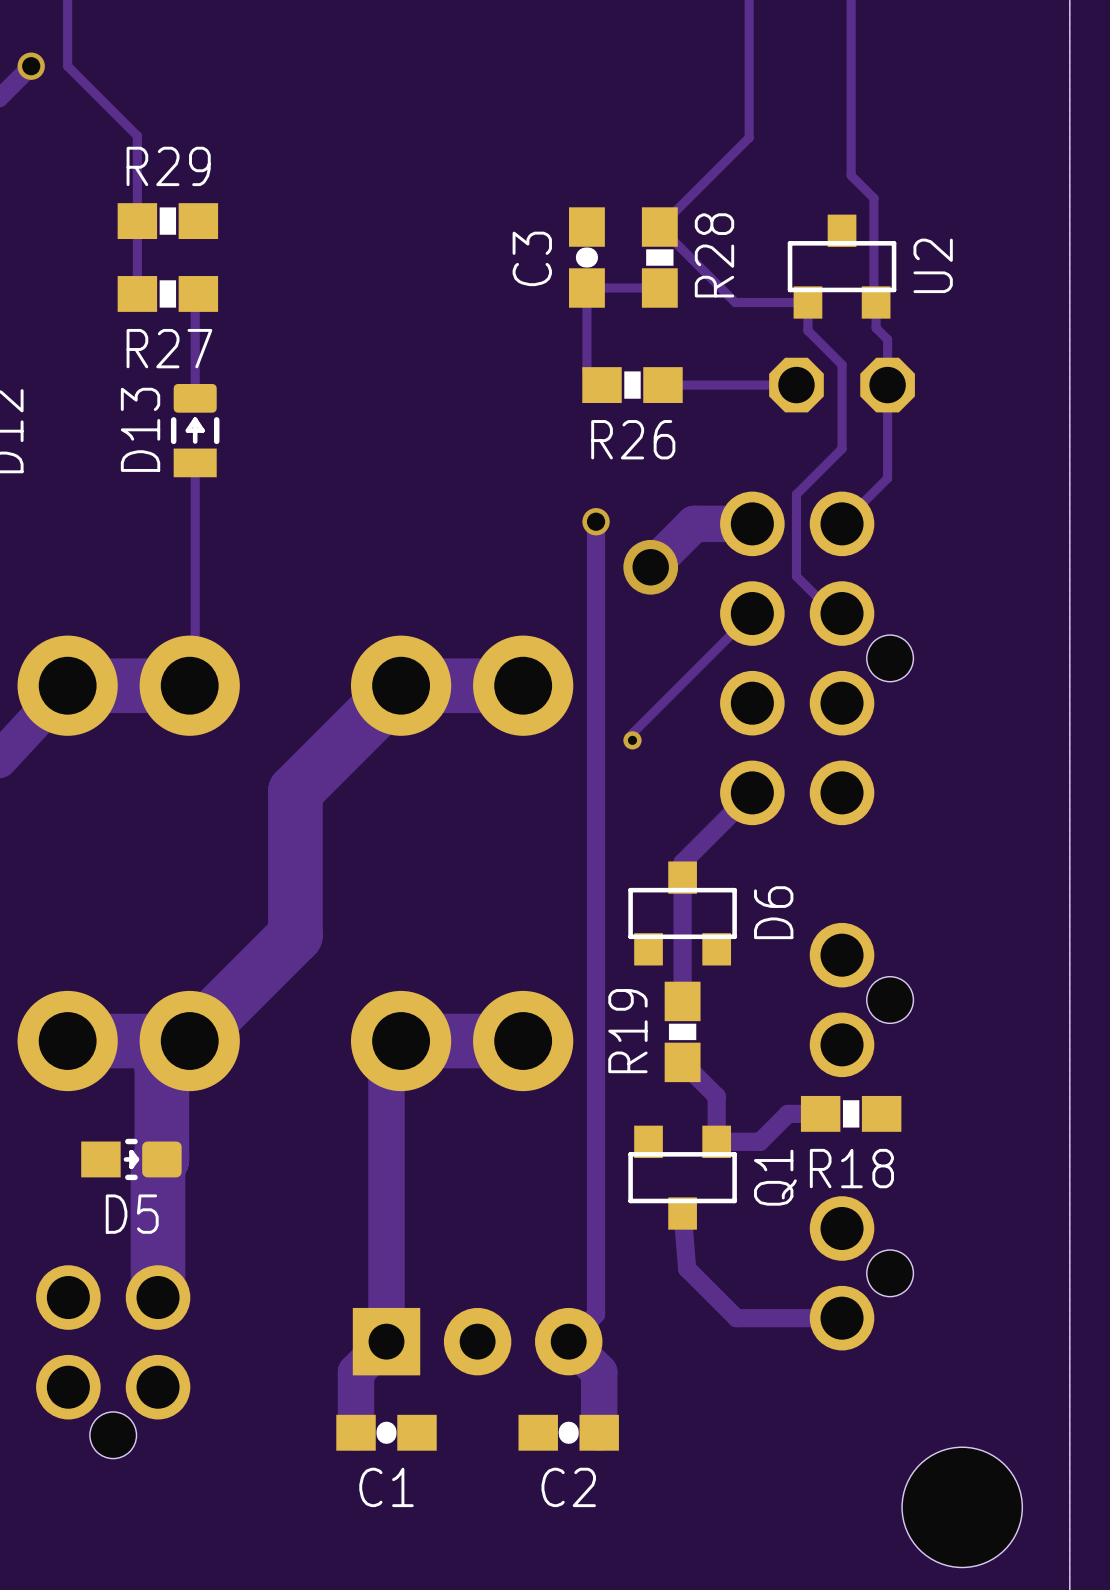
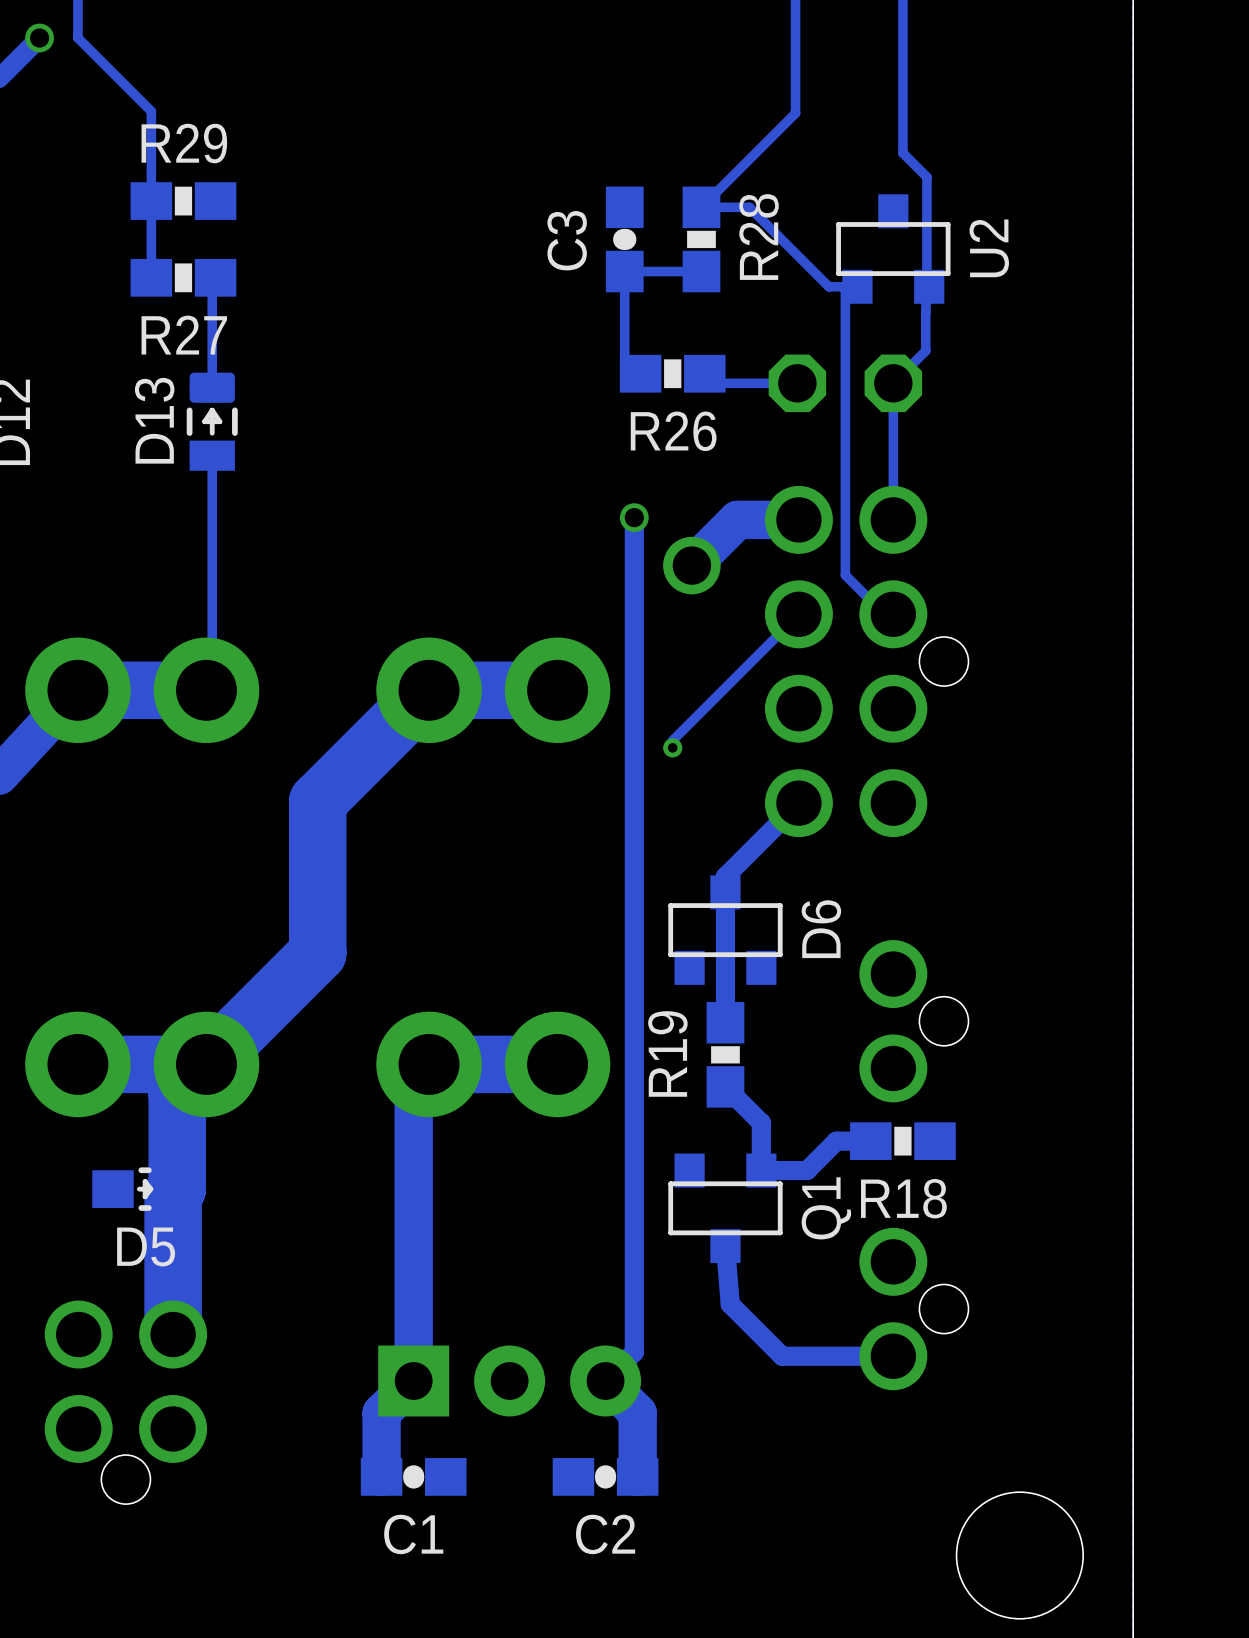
track: (659, 227) (735, 302) (780, 302) -> (701, 207) (749, 207) (828, 286)
track: (873, 289) (878, 293) (878, 300) (876, 302) (876, 328) (887, 339) (887, 478) (842, 523) -> none
track: (796, 302) (807, 302) (807, 330) (842, 364) (842, 394) -> (926, 273) (925, 350) (893, 383)
track: none -> (845, 286) (845, 488)
track: (796, 385) (662, 385) -> (797, 383) (714, 383) (704, 373)
part position: (842, 385) -> (845, 383)
track: (842, 448) (796, 494) -> (893, 440) (893, 519)

